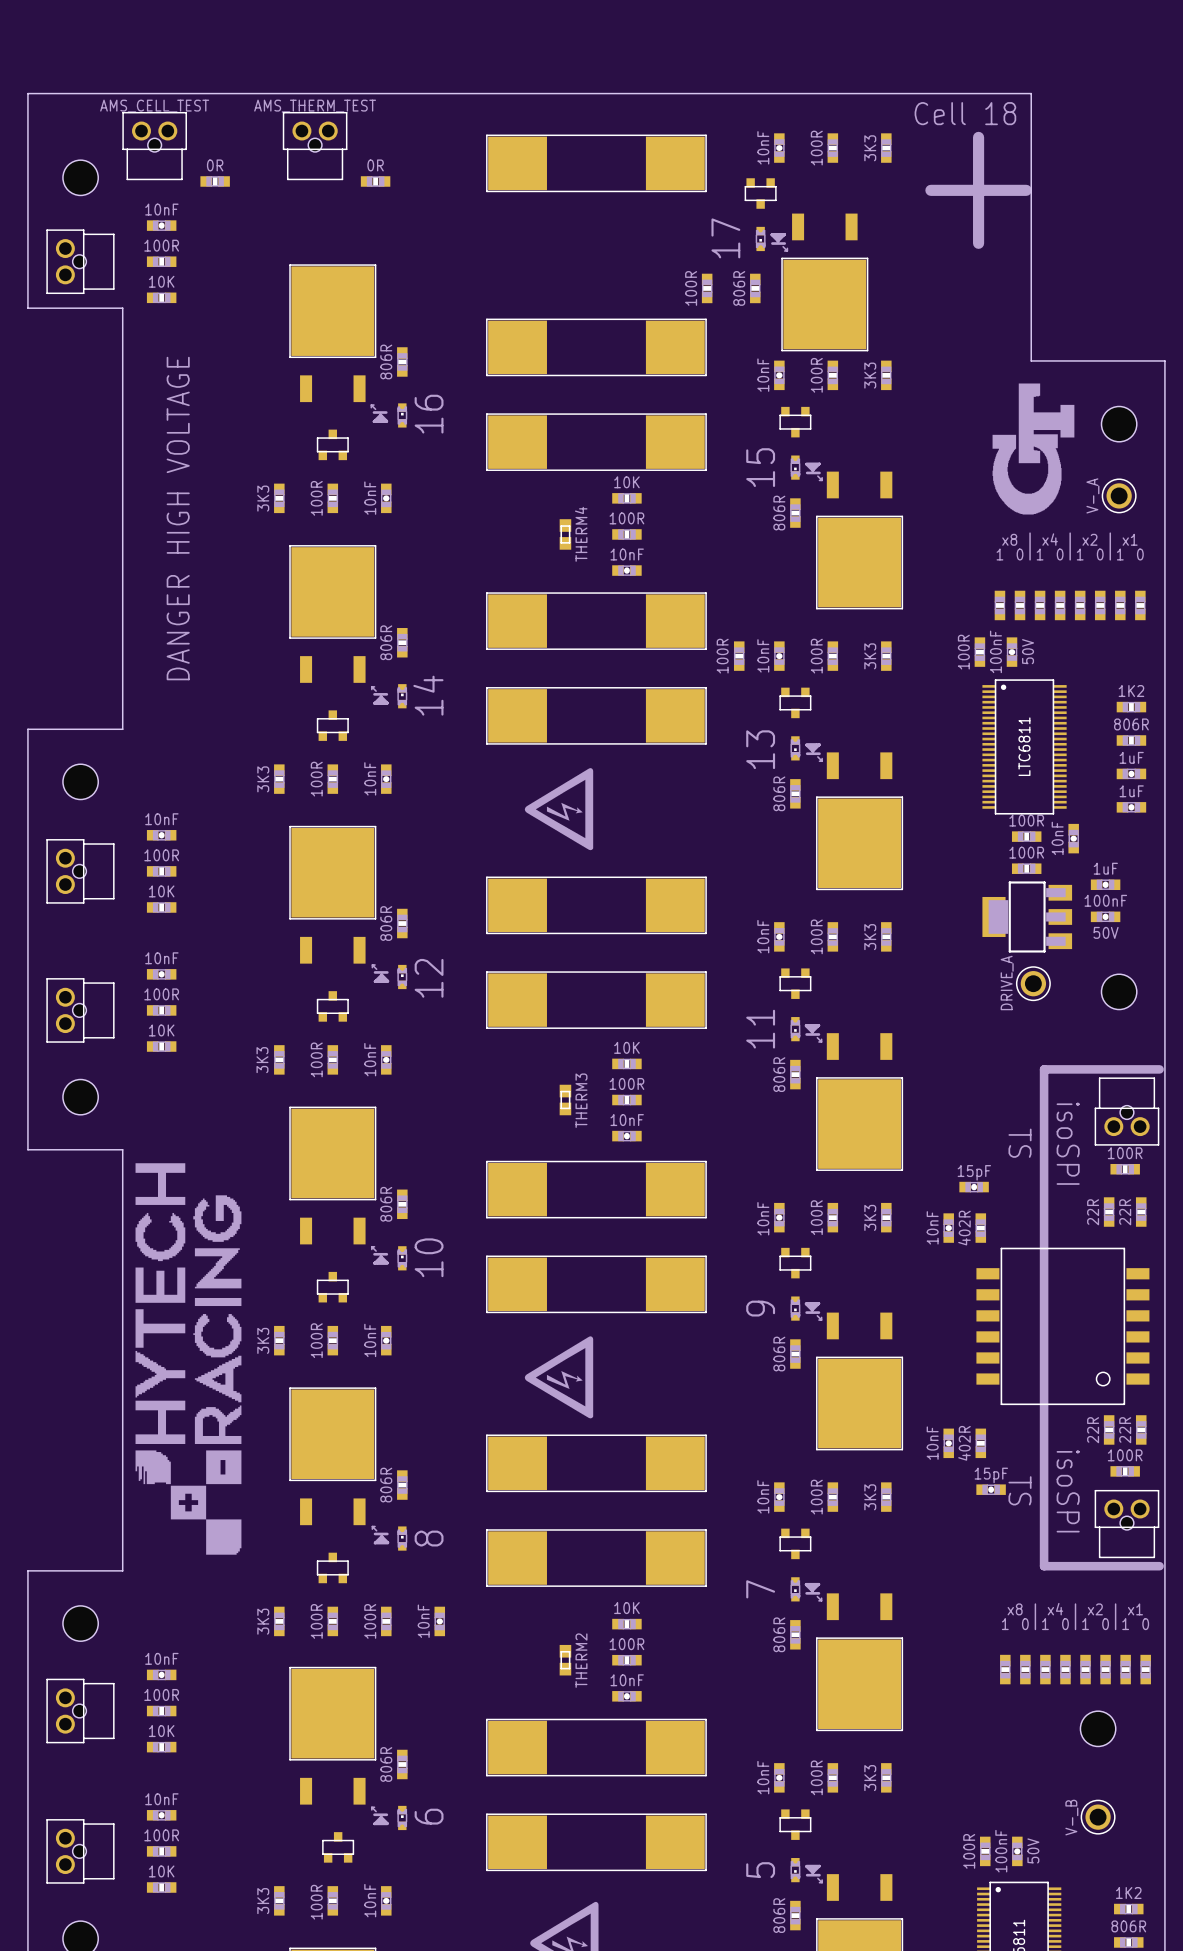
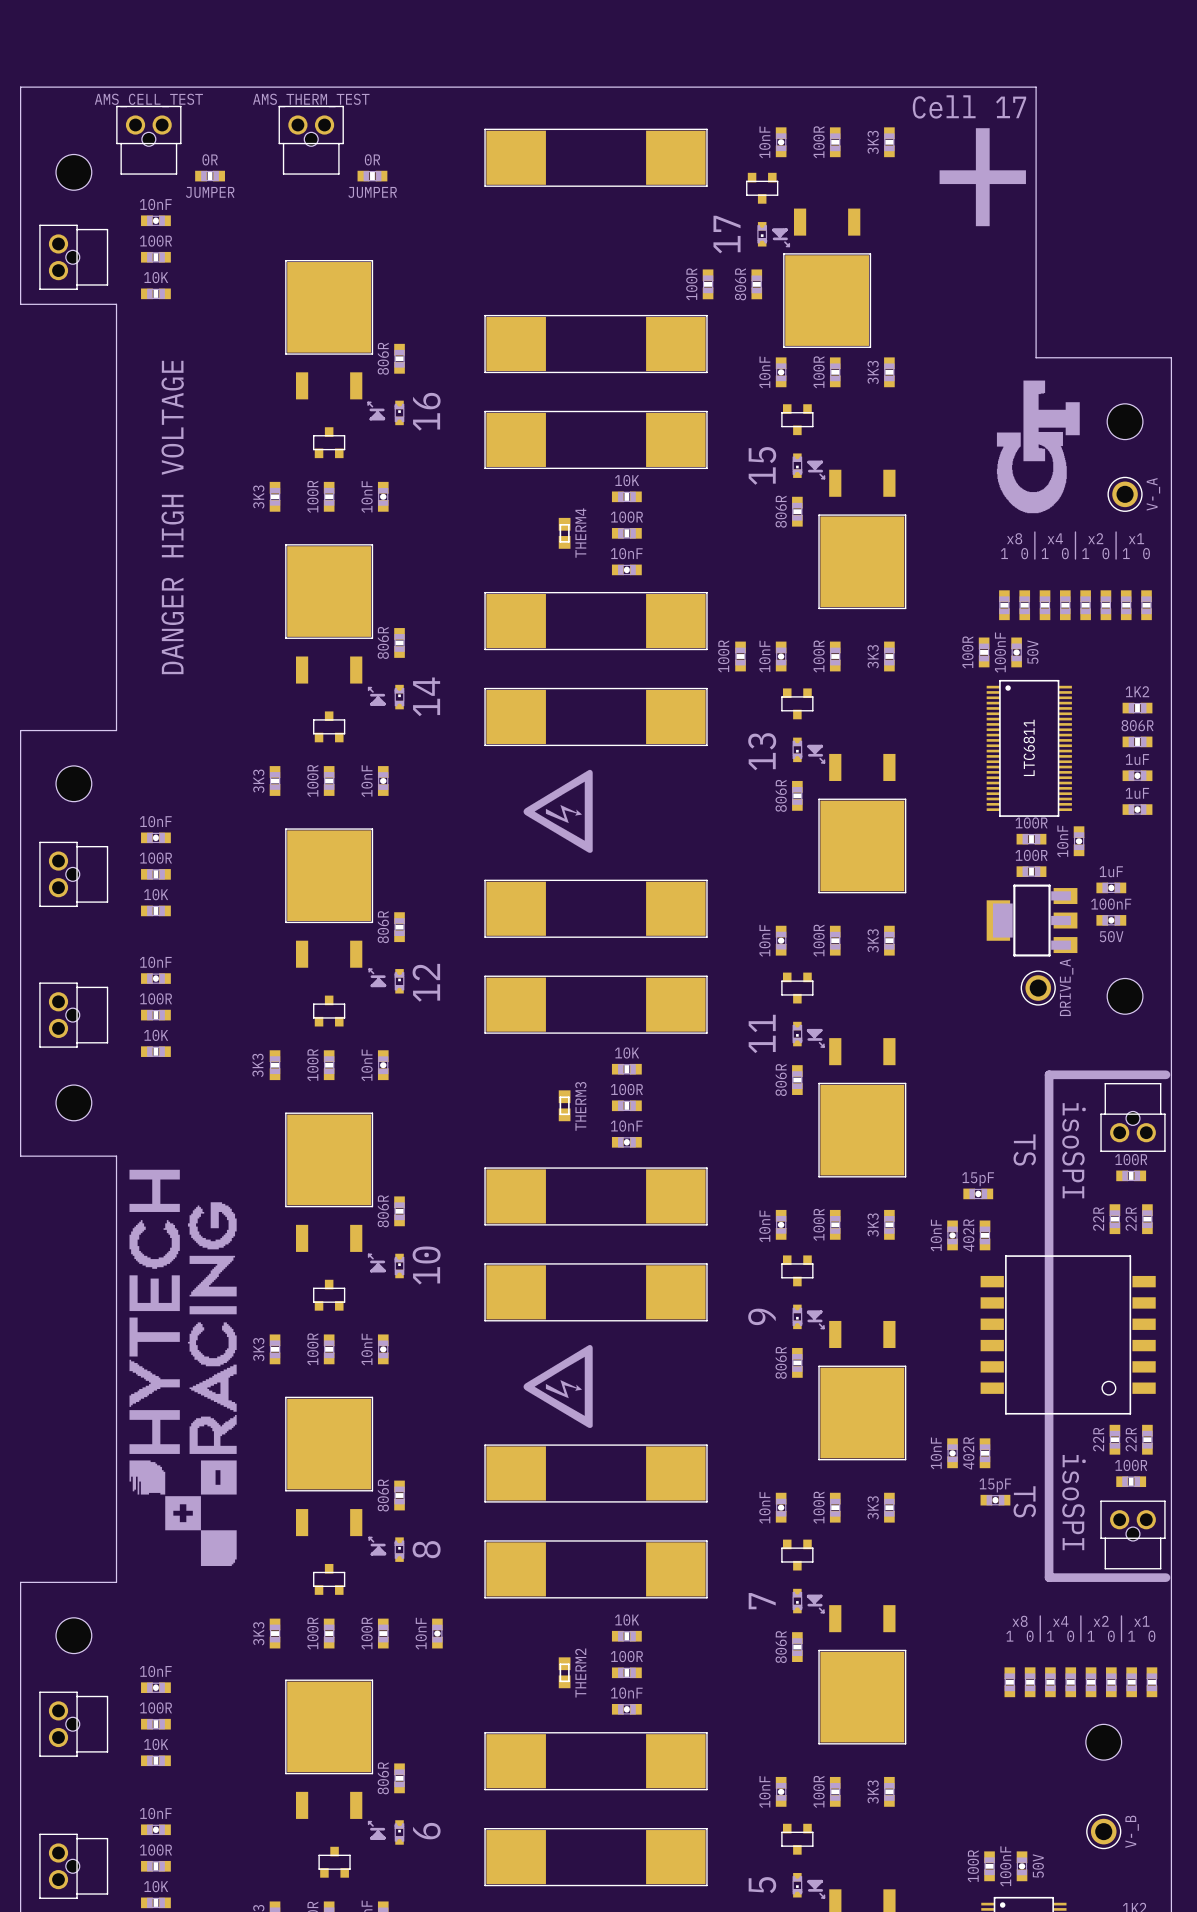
text: Cell 18 (965, 113) -> Cell 17 (969, 106)
part text: none -> JUMPER (210, 192)
part text: none -> JUMPER (372, 192)
text position: V-_A (1092, 495) -> V-_A (1153, 494)
text position: DRIVE_A (1007, 982) -> DRIVE_A (1066, 987)
text position: V-_B (1071, 1817) -> V-_B (1132, 1831)

